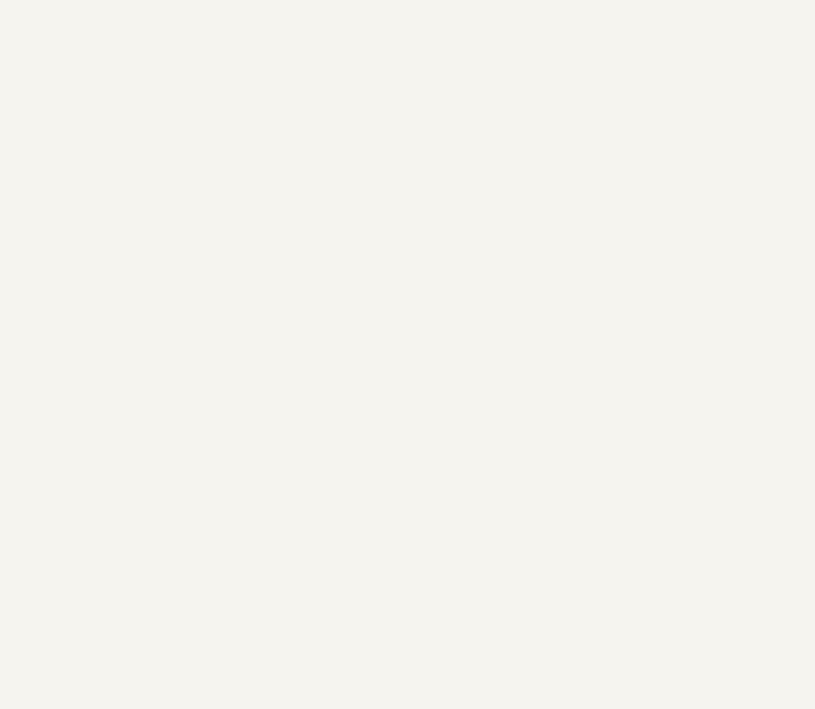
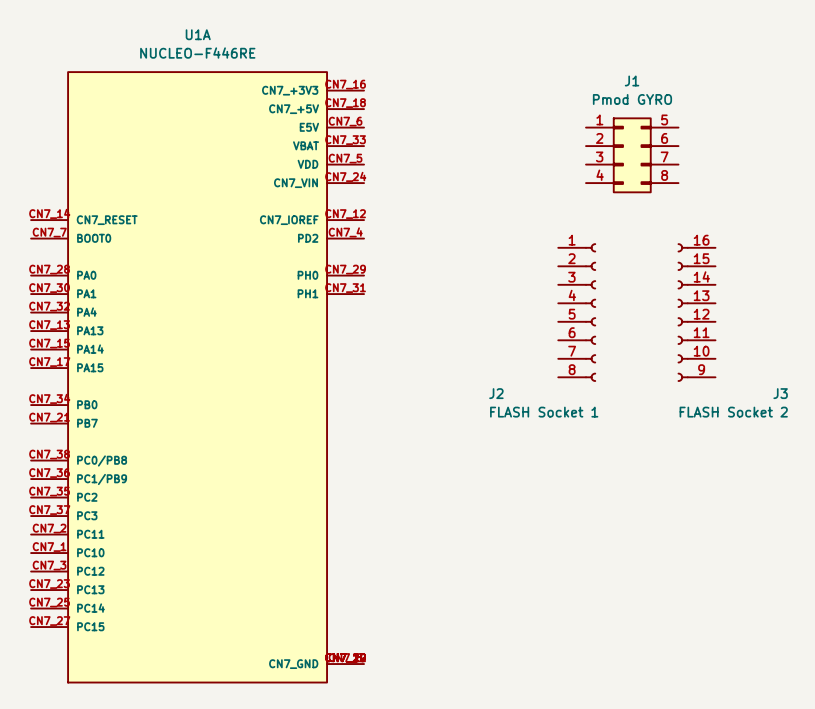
J1: none -> Pmod GYRO (632, 155)
J2: none -> FLASH Socket 1 (577, 312)
J3: none -> FLASH Socket 2 (696, 312)
U1A: none -> NUCLEO-F446RE (197, 377)

